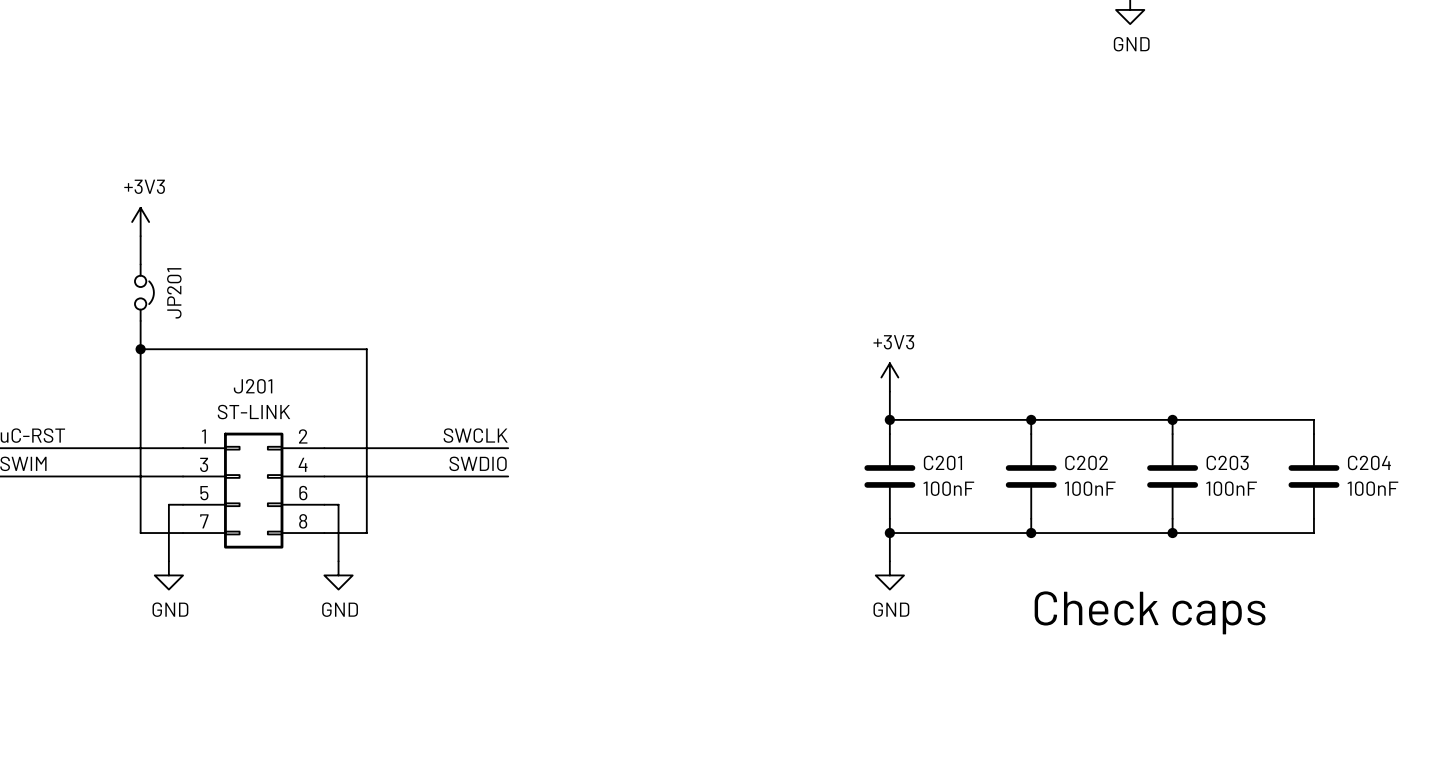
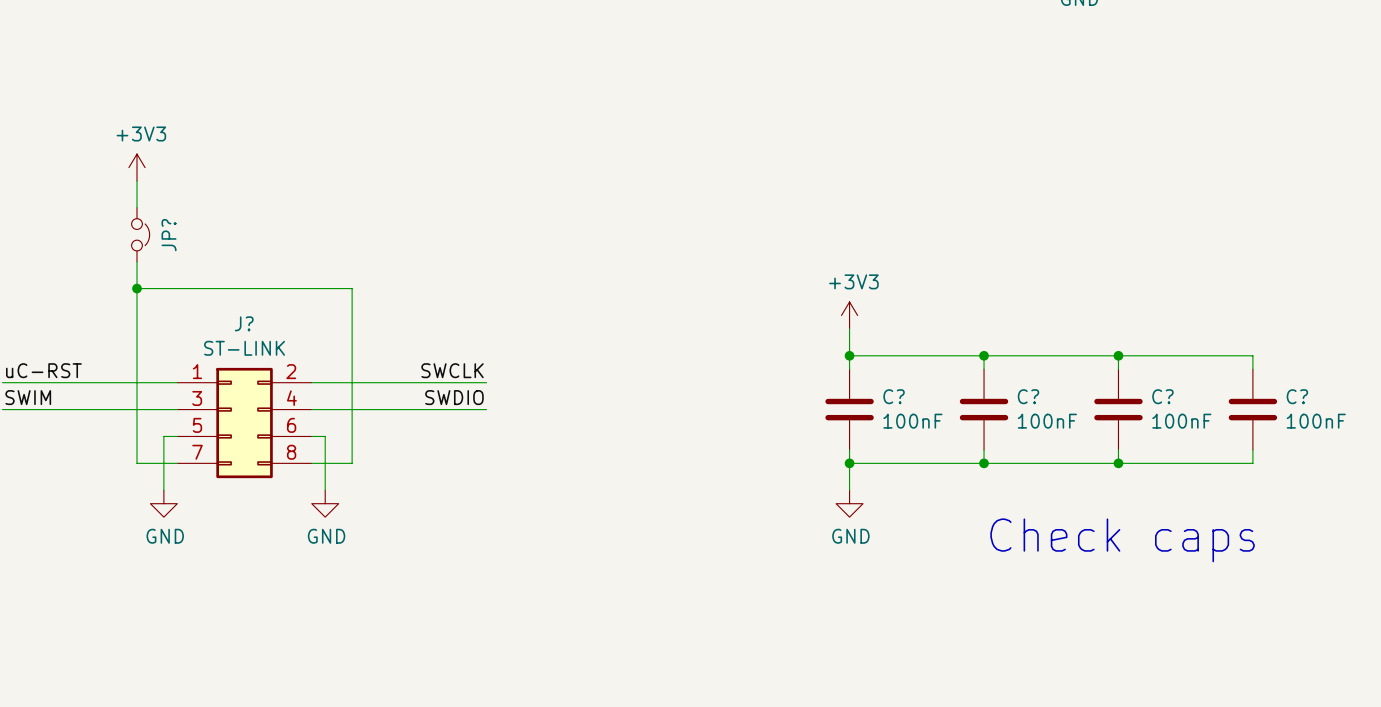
JP201 name: JP201 (174, 293) -> JP? (169, 235)
J201 name: J201 (253, 386) -> J? (244, 323)
C201 name: C201 (942, 462) -> C? (894, 396)
C202 name: C202 (1086, 462) -> C? (1028, 396)
C203 name: C203 (1227, 462) -> C? (1162, 396)
C204 name: C204 (1369, 462) -> C? (1297, 396)

